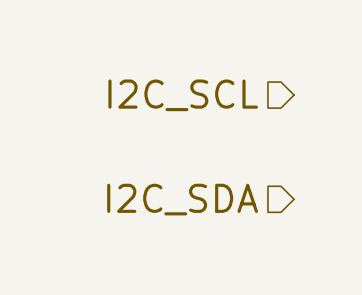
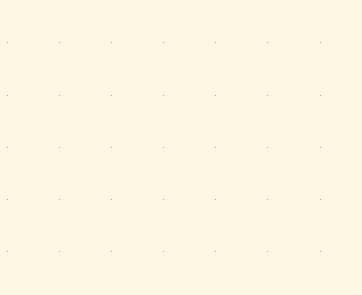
hierarchical label: I2C_SCL (183, 95) -> none
hierarchical label: I2C_SDA (182, 199) -> none

